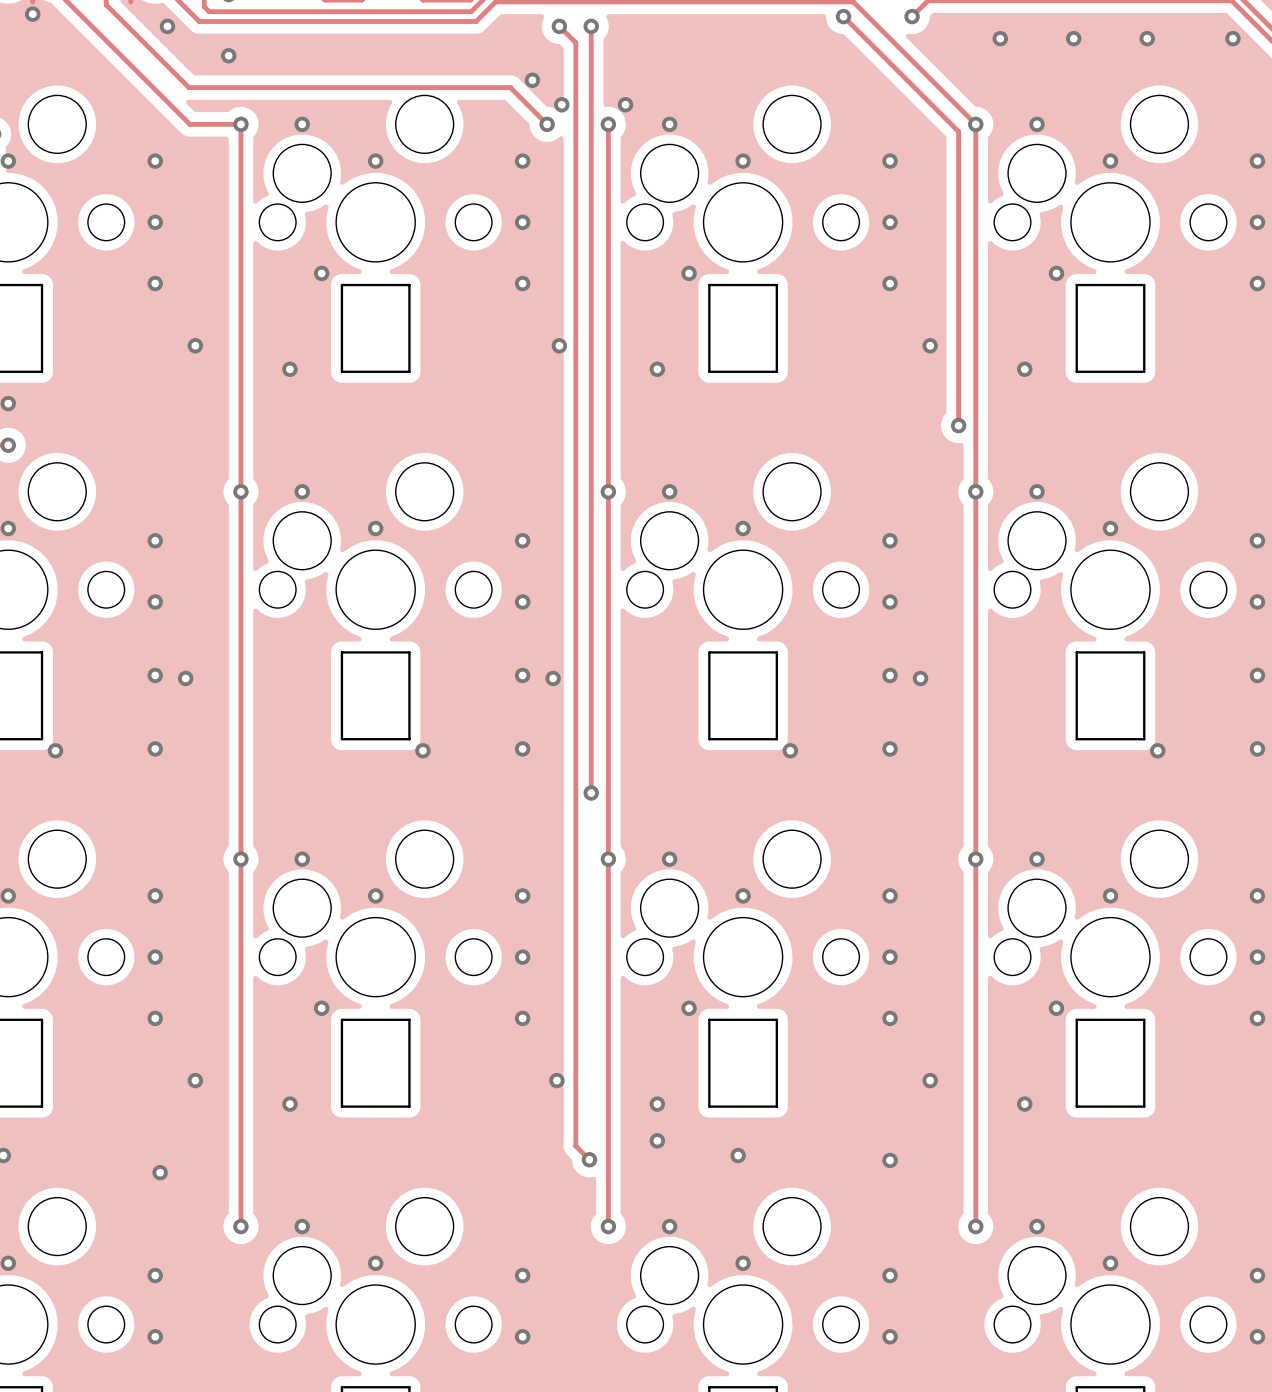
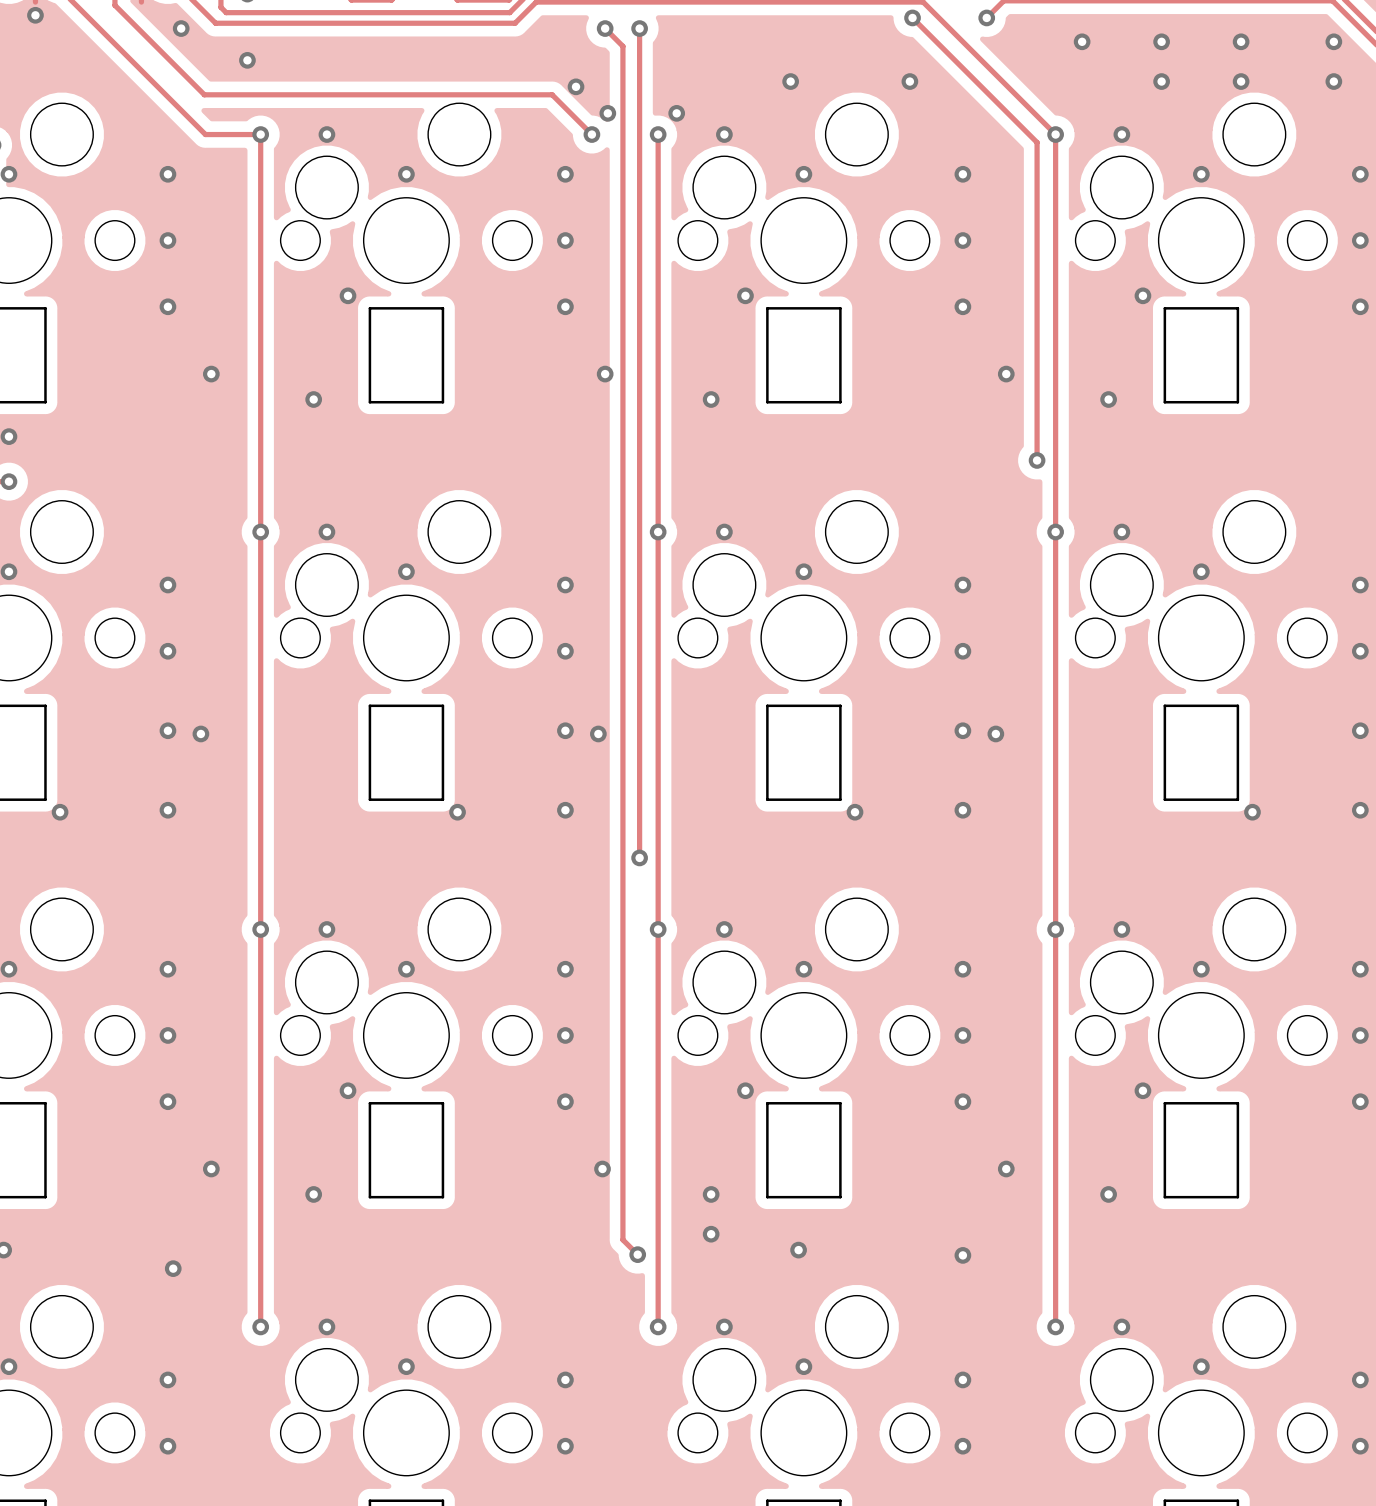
via: none -> (790, 81)
via: none -> (909, 81)
via: none -> (1161, 81)
via: none -> (1241, 81)
via: none -> (1333, 81)

